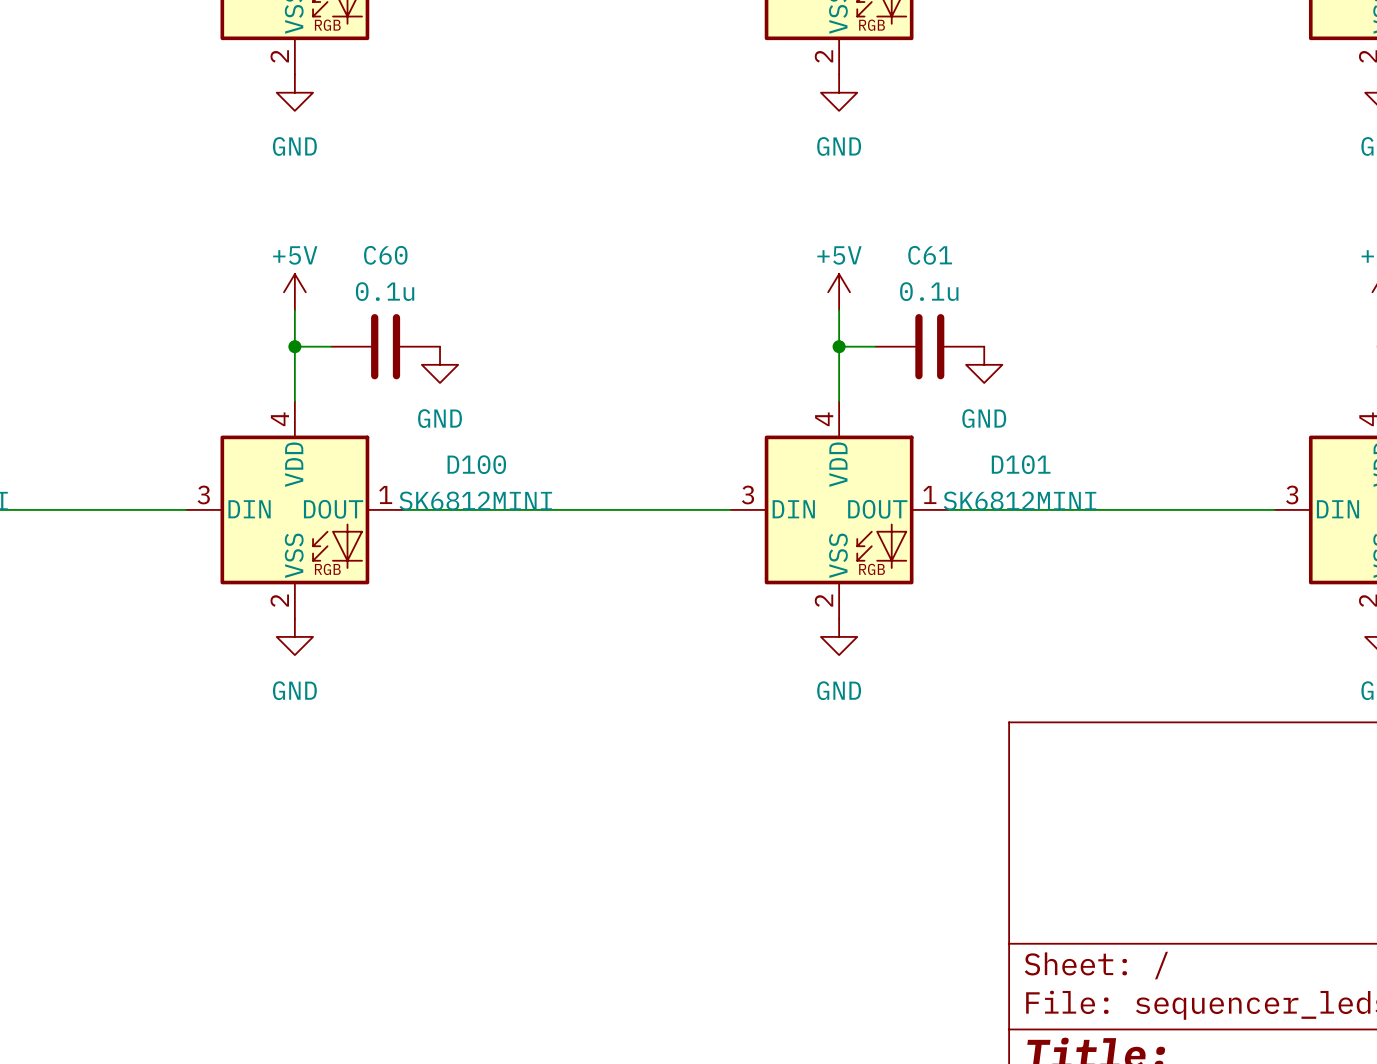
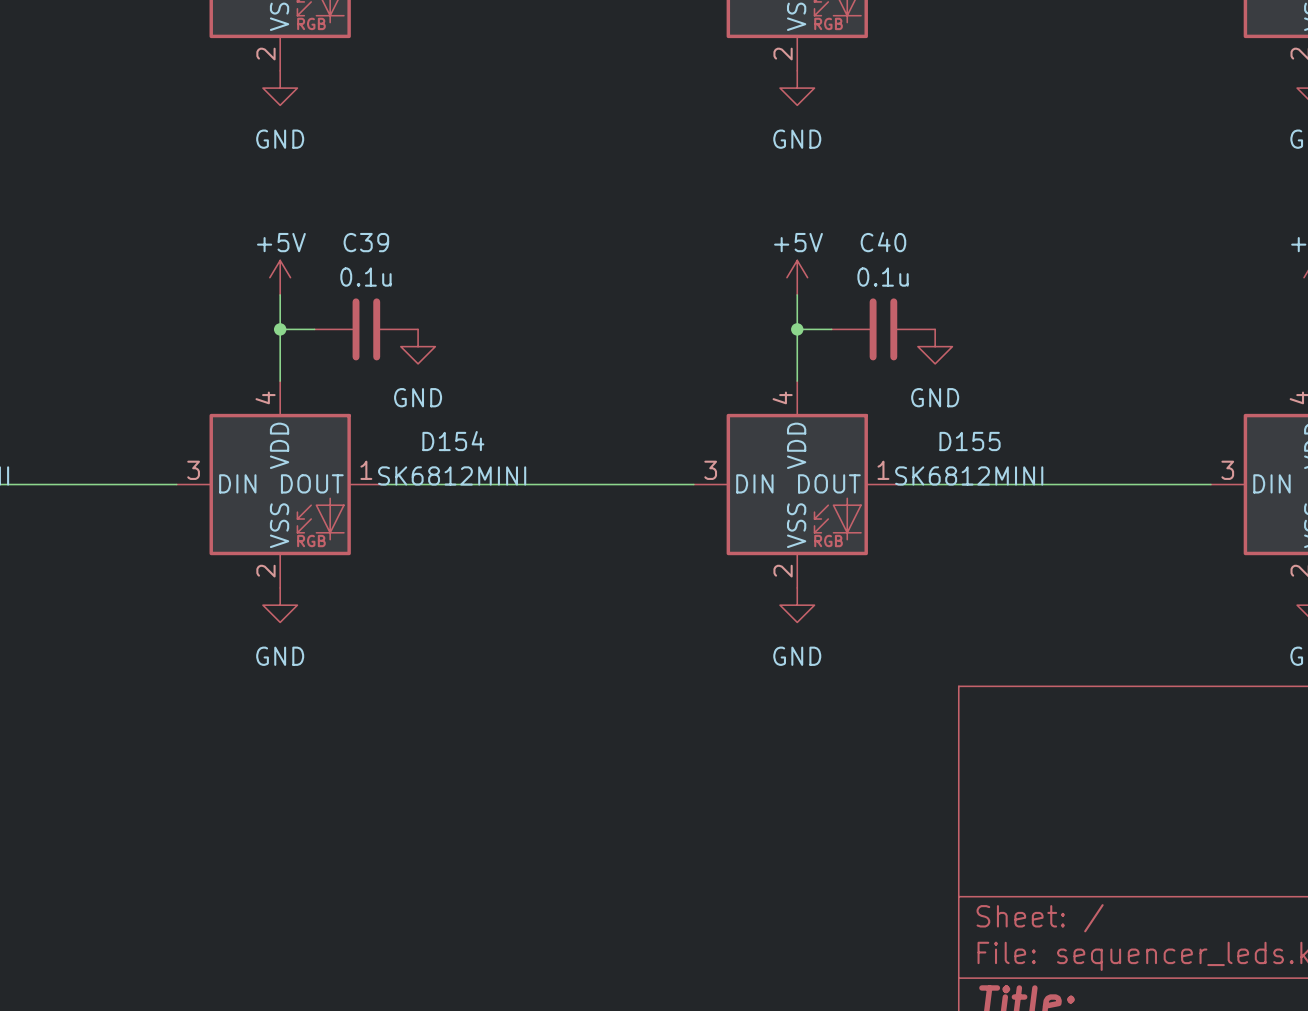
C60 name: C60 (385, 255) -> C39 (366, 242)
C61 name: C61 (930, 255) -> C40 (883, 242)
D100 name: D100 (476, 464) -> D154 (453, 441)
D101 name: D101 (1021, 464) -> D155 (970, 441)

